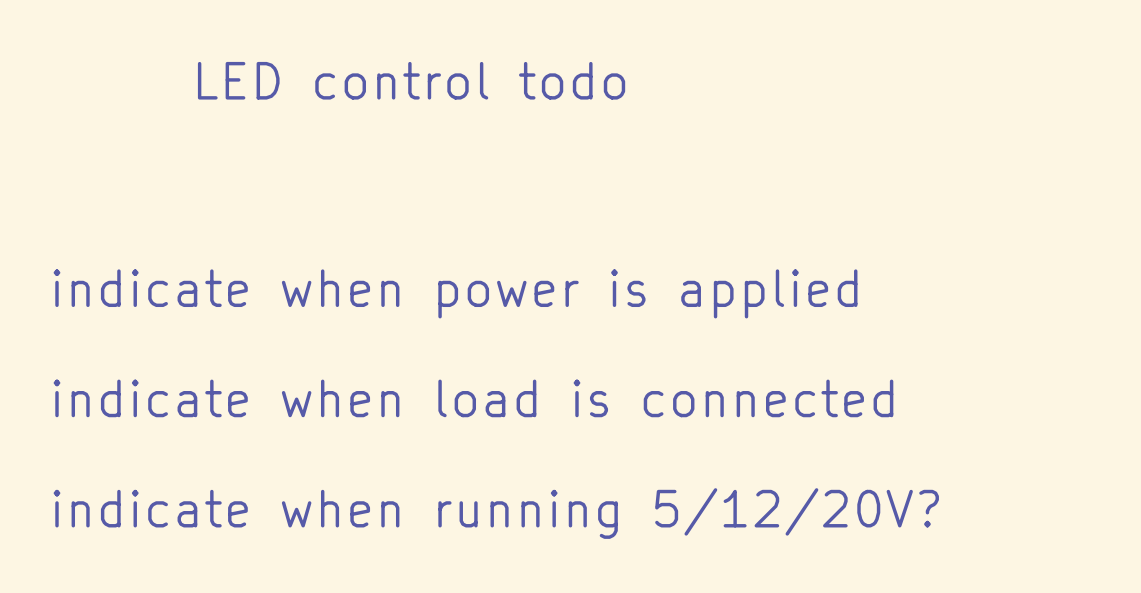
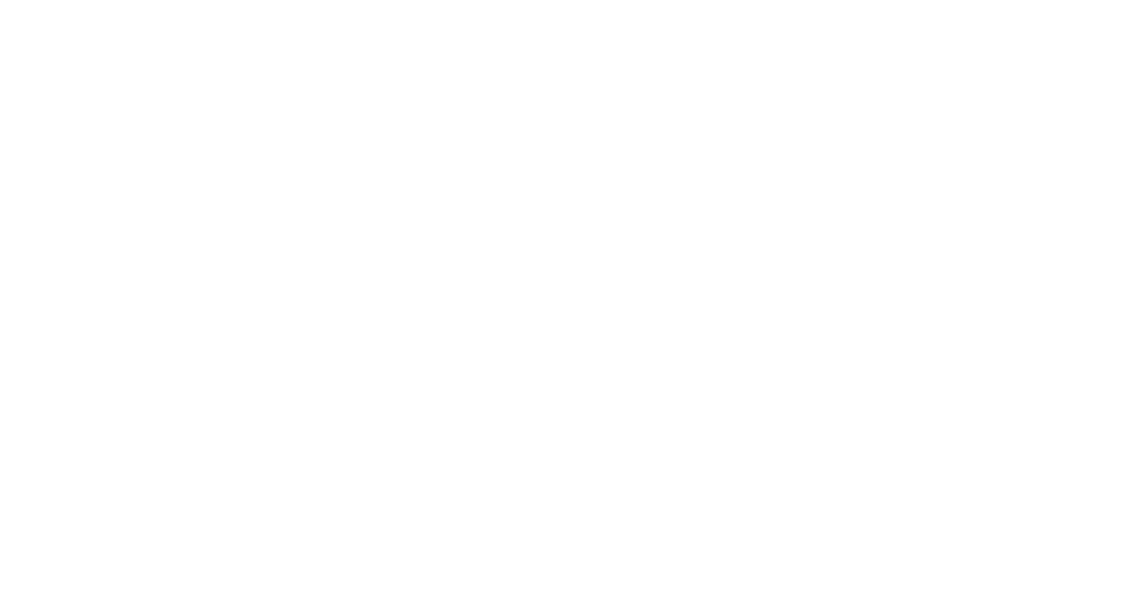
text: LED control todo (411, 80) -> none
text: indicate when power is applied (455, 293) -> none
text: indicate when load is connected (473, 398) -> none
text: indicate when running 5/12/20V? (496, 513) -> none

